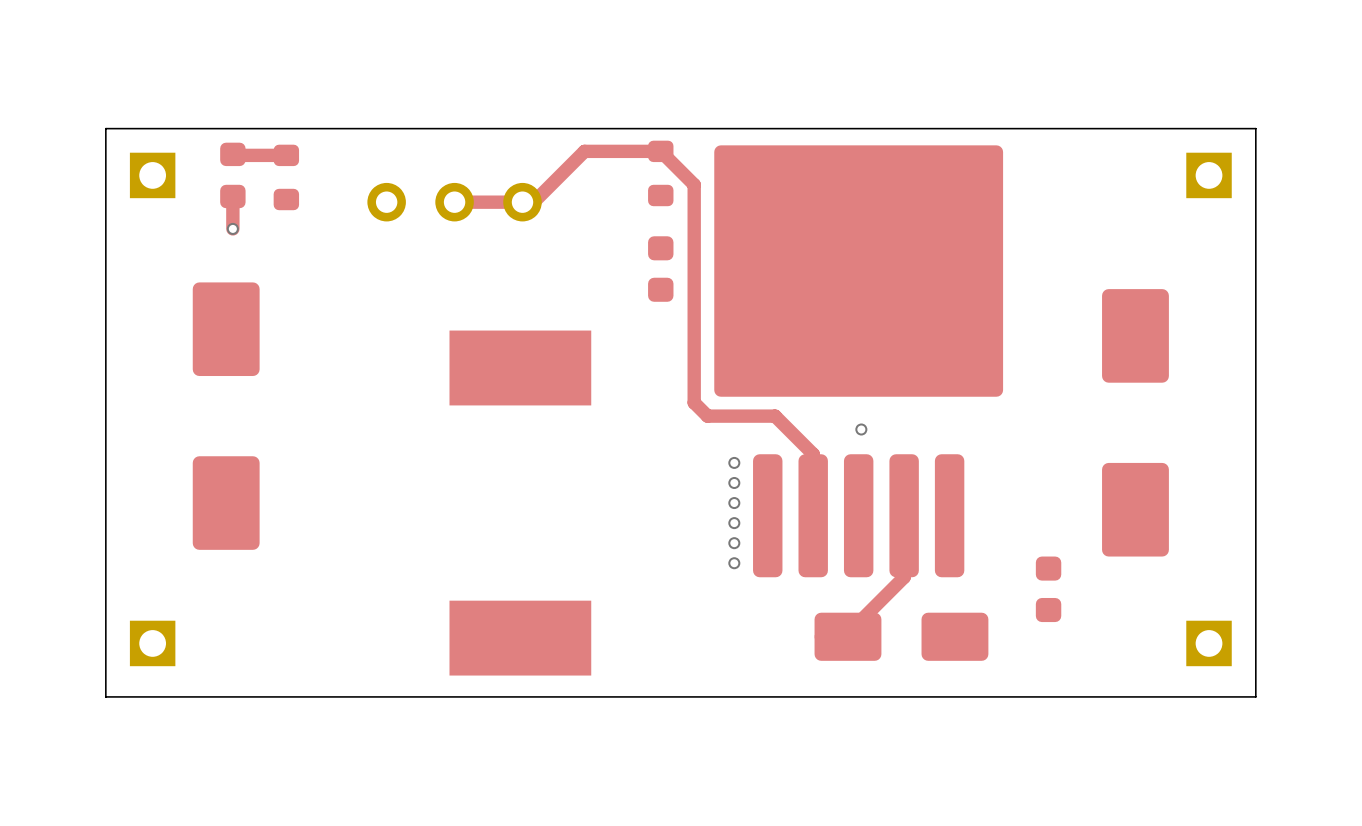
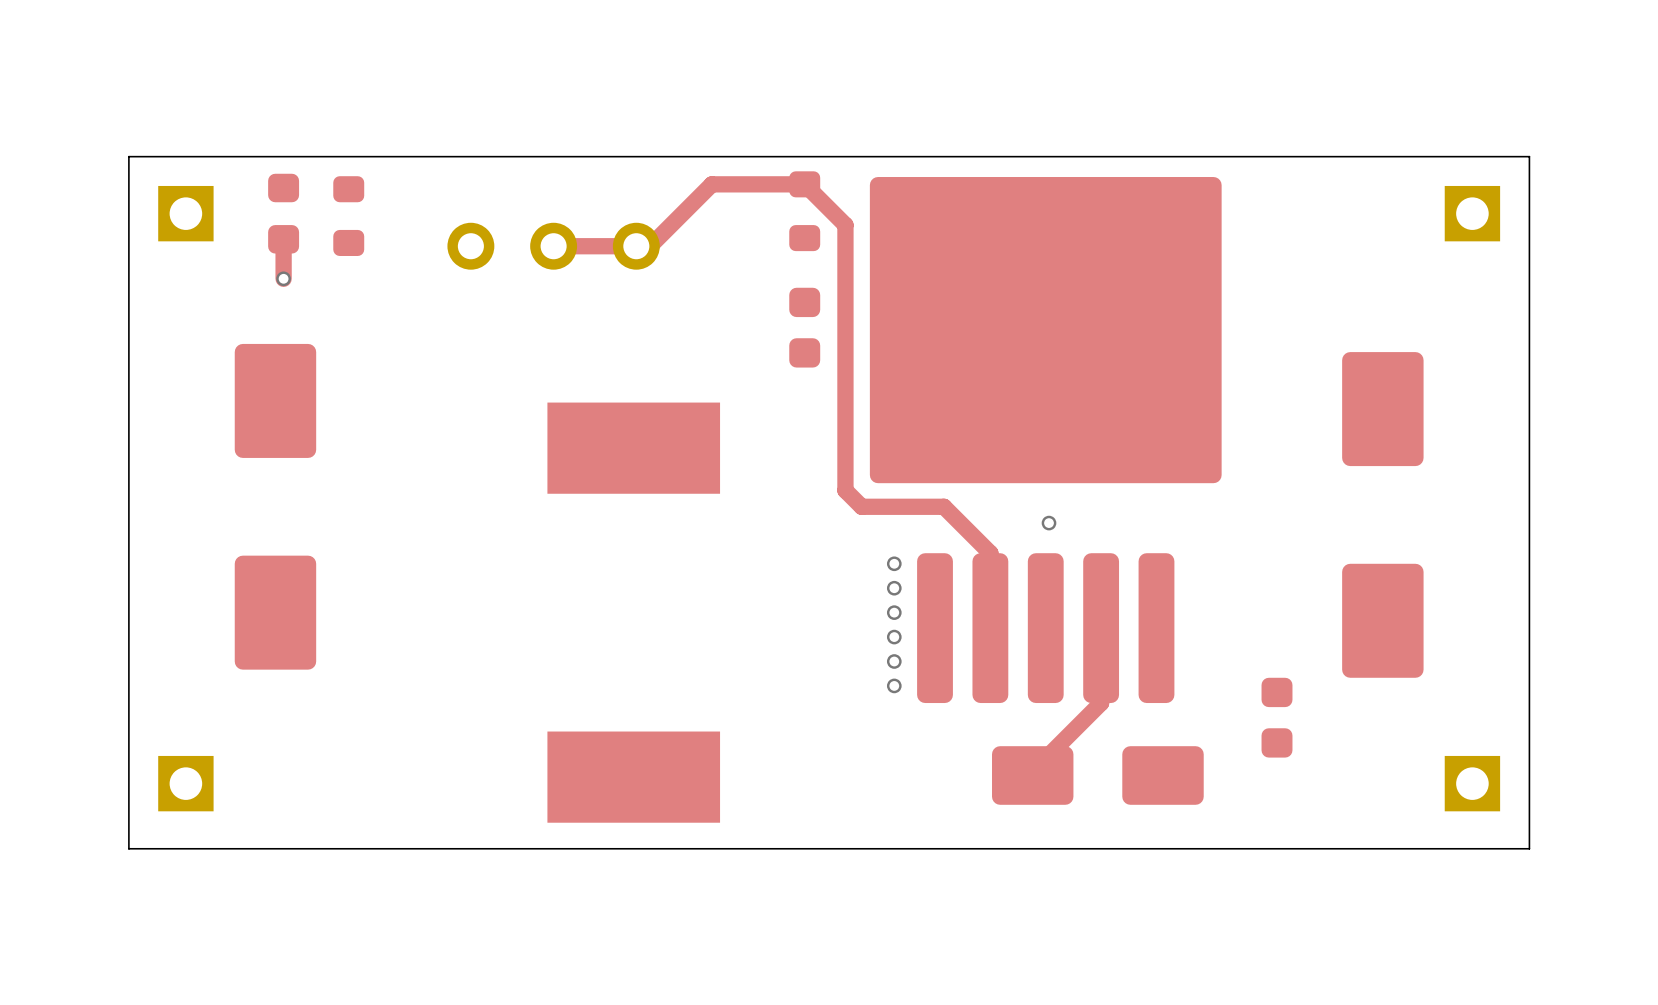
top track: (232, 154) (286, 155) -> none

